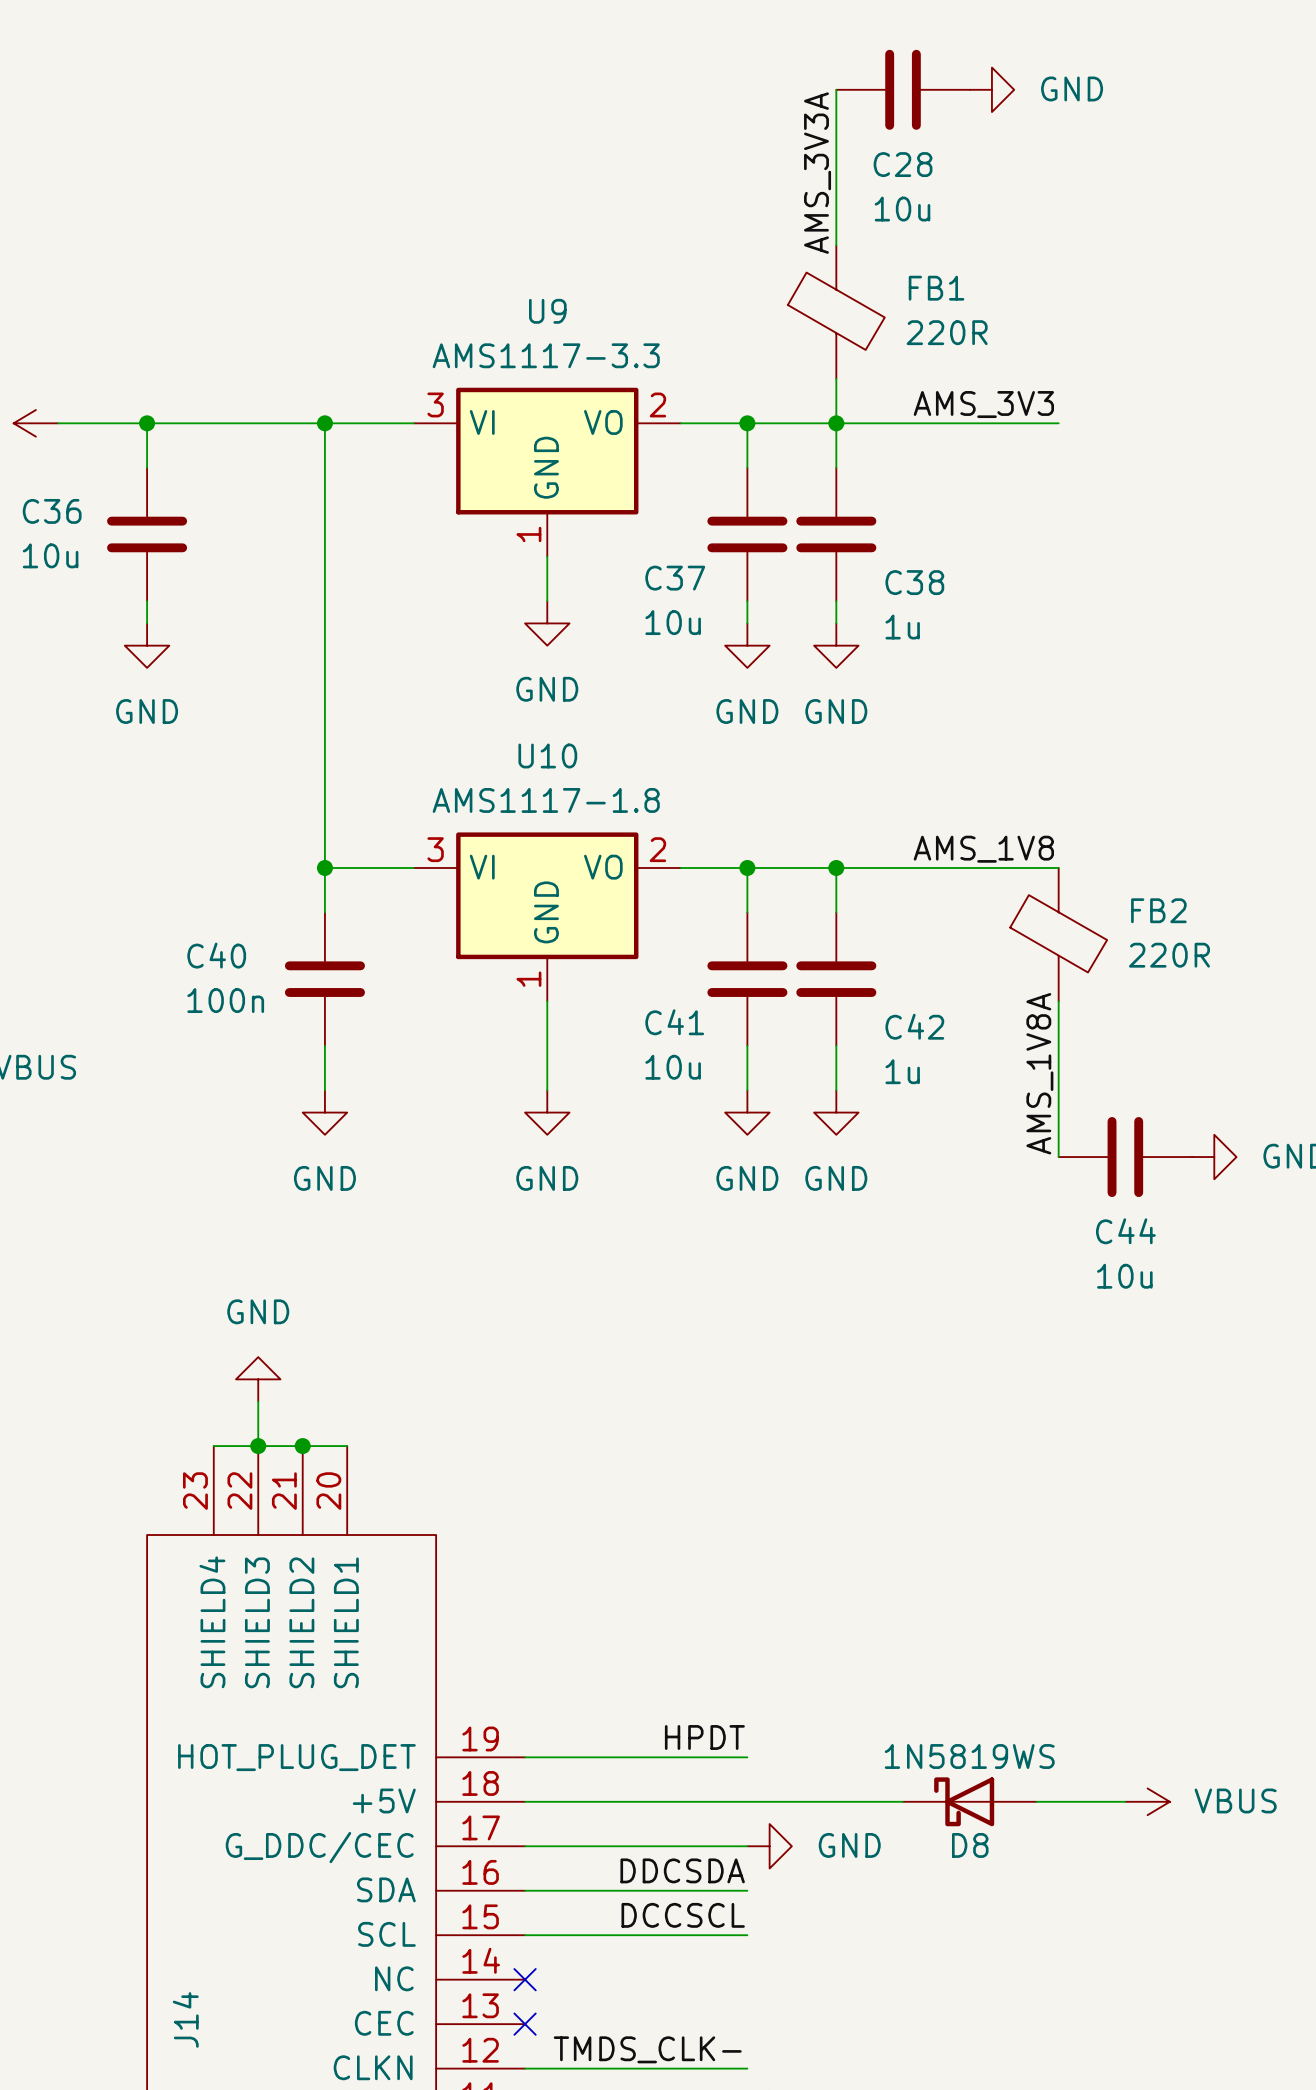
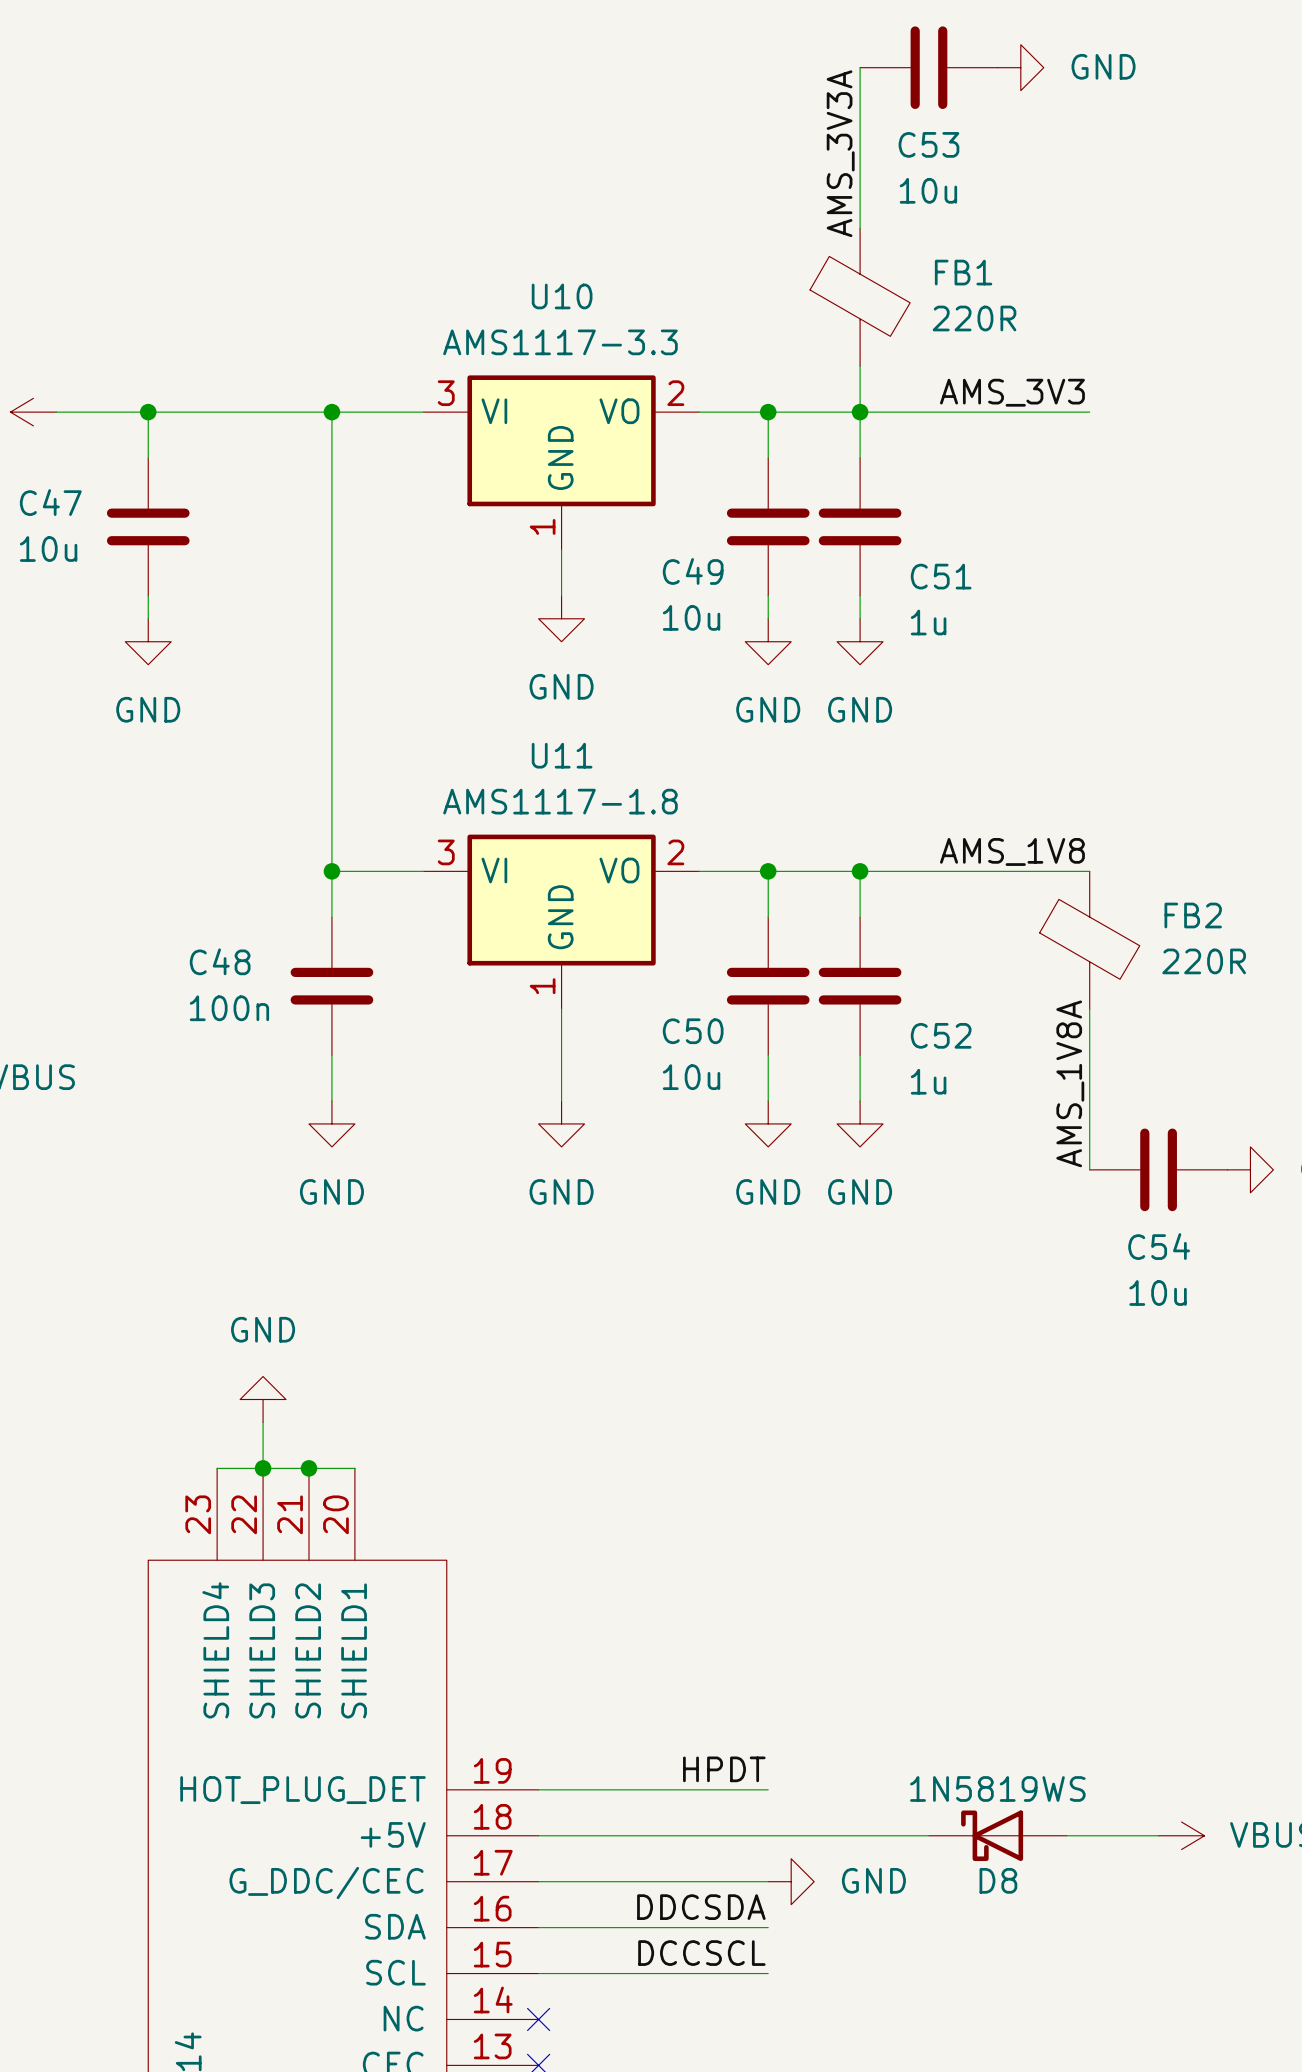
C28 name: C28 (903, 164) -> C53 (928, 144)
U9 name: U9 (547, 311) -> U10 (562, 296)
C36 name: C36 (52, 511) -> C47 (50, 502)
C37 name: C37 (675, 578) -> C49 (693, 571)
C38 name: C38 (914, 582) -> C51 (941, 576)
U10 name: U10 (547, 755) -> U11 (562, 755)
C40 name: C40 (216, 955) -> C48 (220, 961)
C41 name: C41 (674, 1022) -> C50 (693, 1031)
C42 name: C42 (914, 1026) -> C52 (941, 1035)
C44 name: C44 (1125, 1231) -> C54 (1159, 1246)

